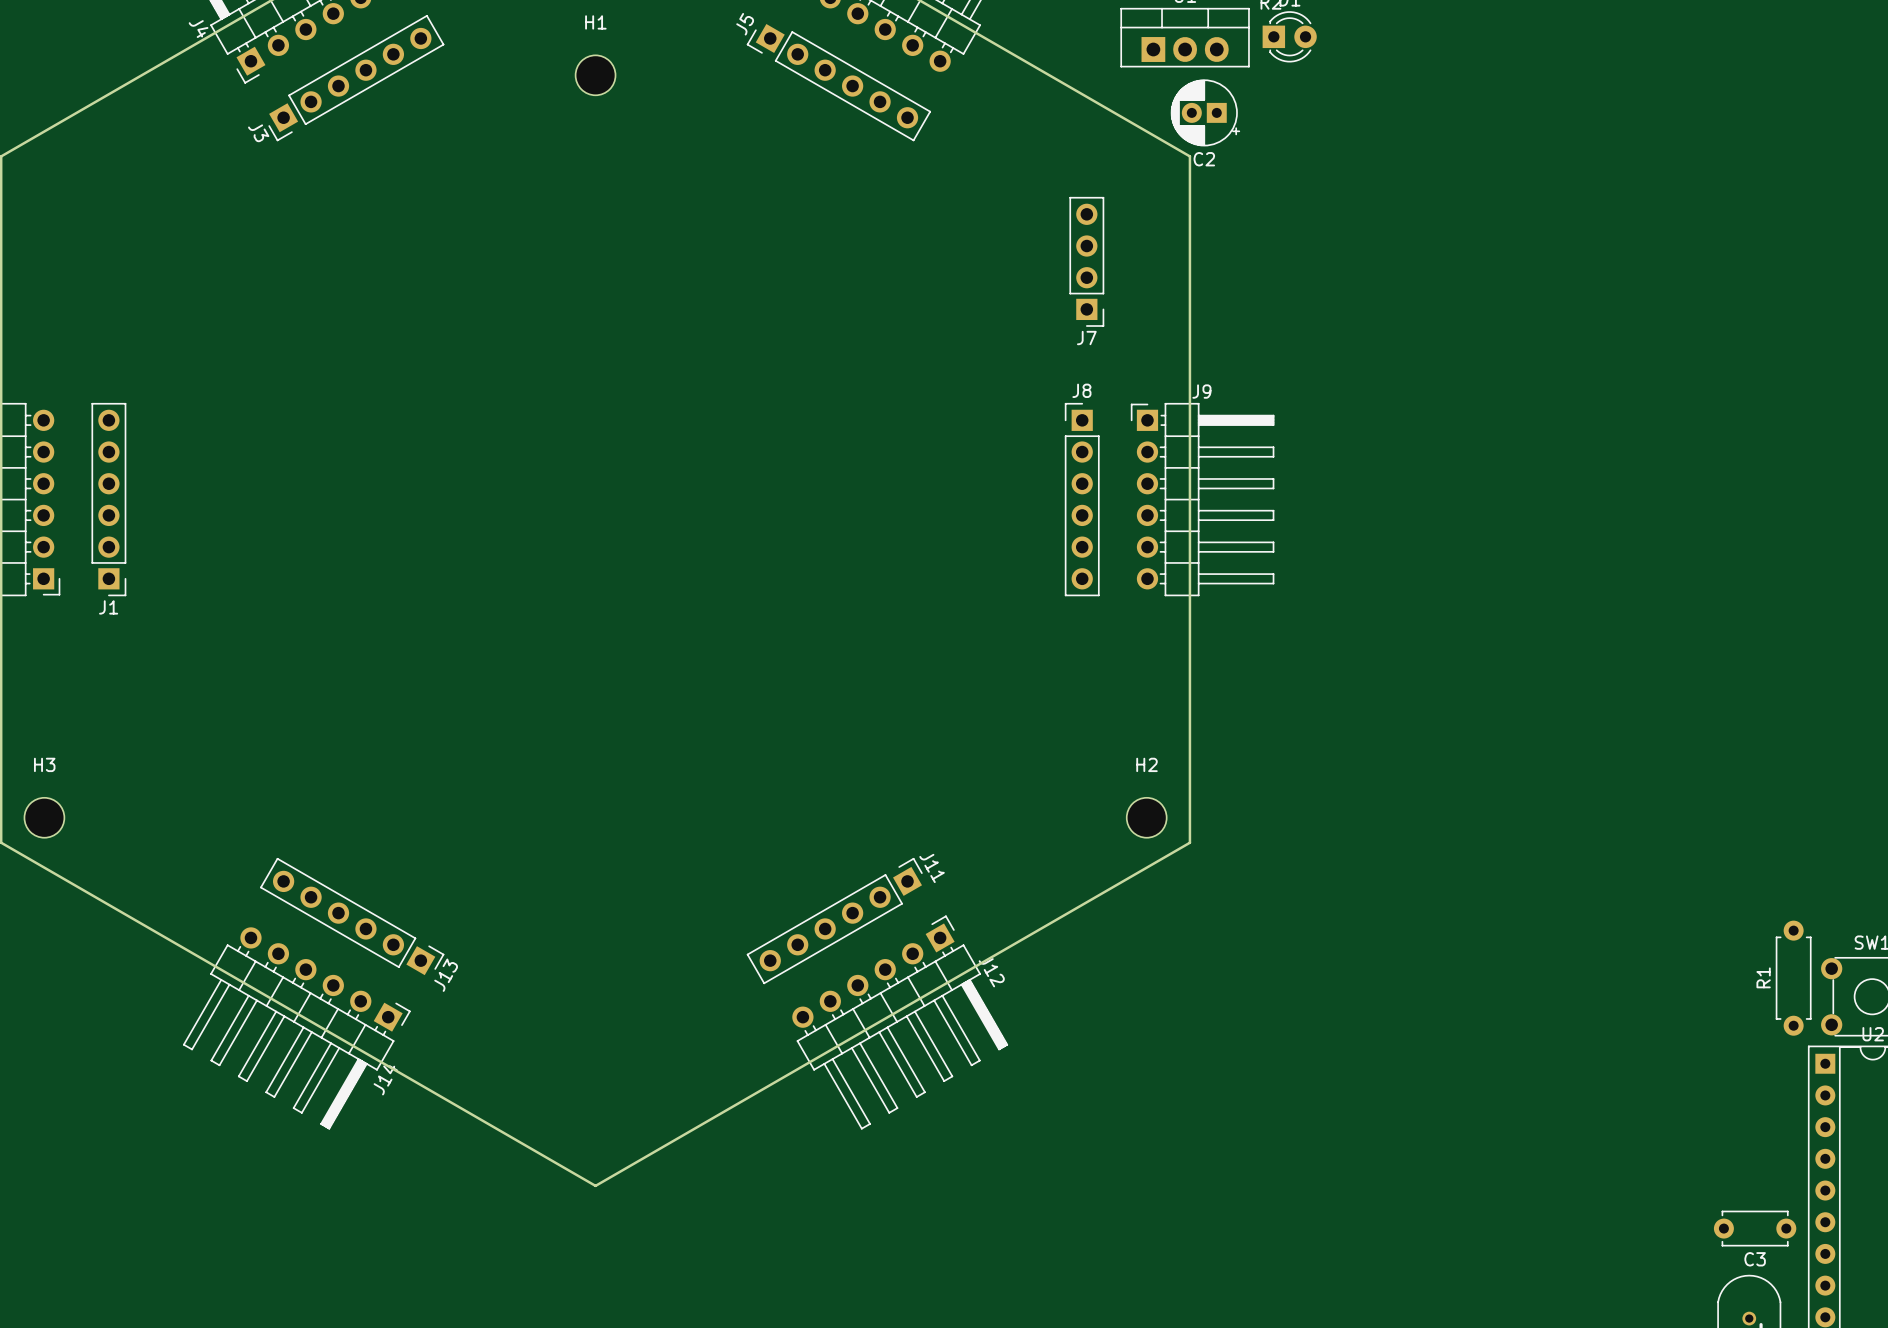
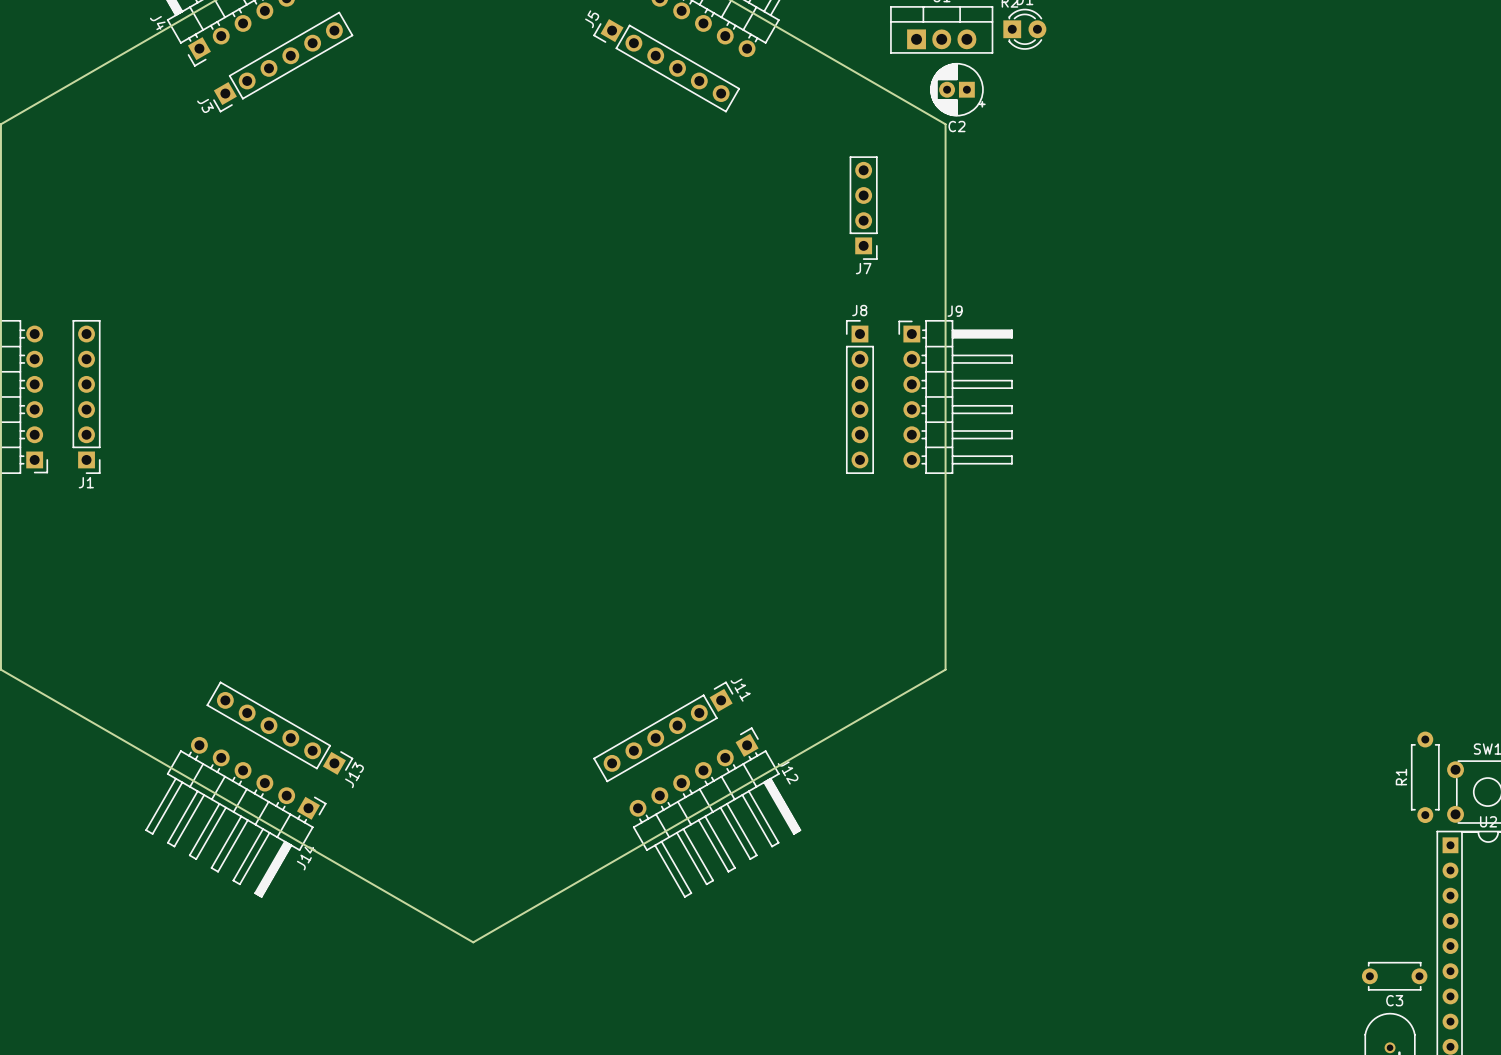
H1: (595, 75) -> none
H3: (44, 817) -> none
H2: (1146, 817) -> none

